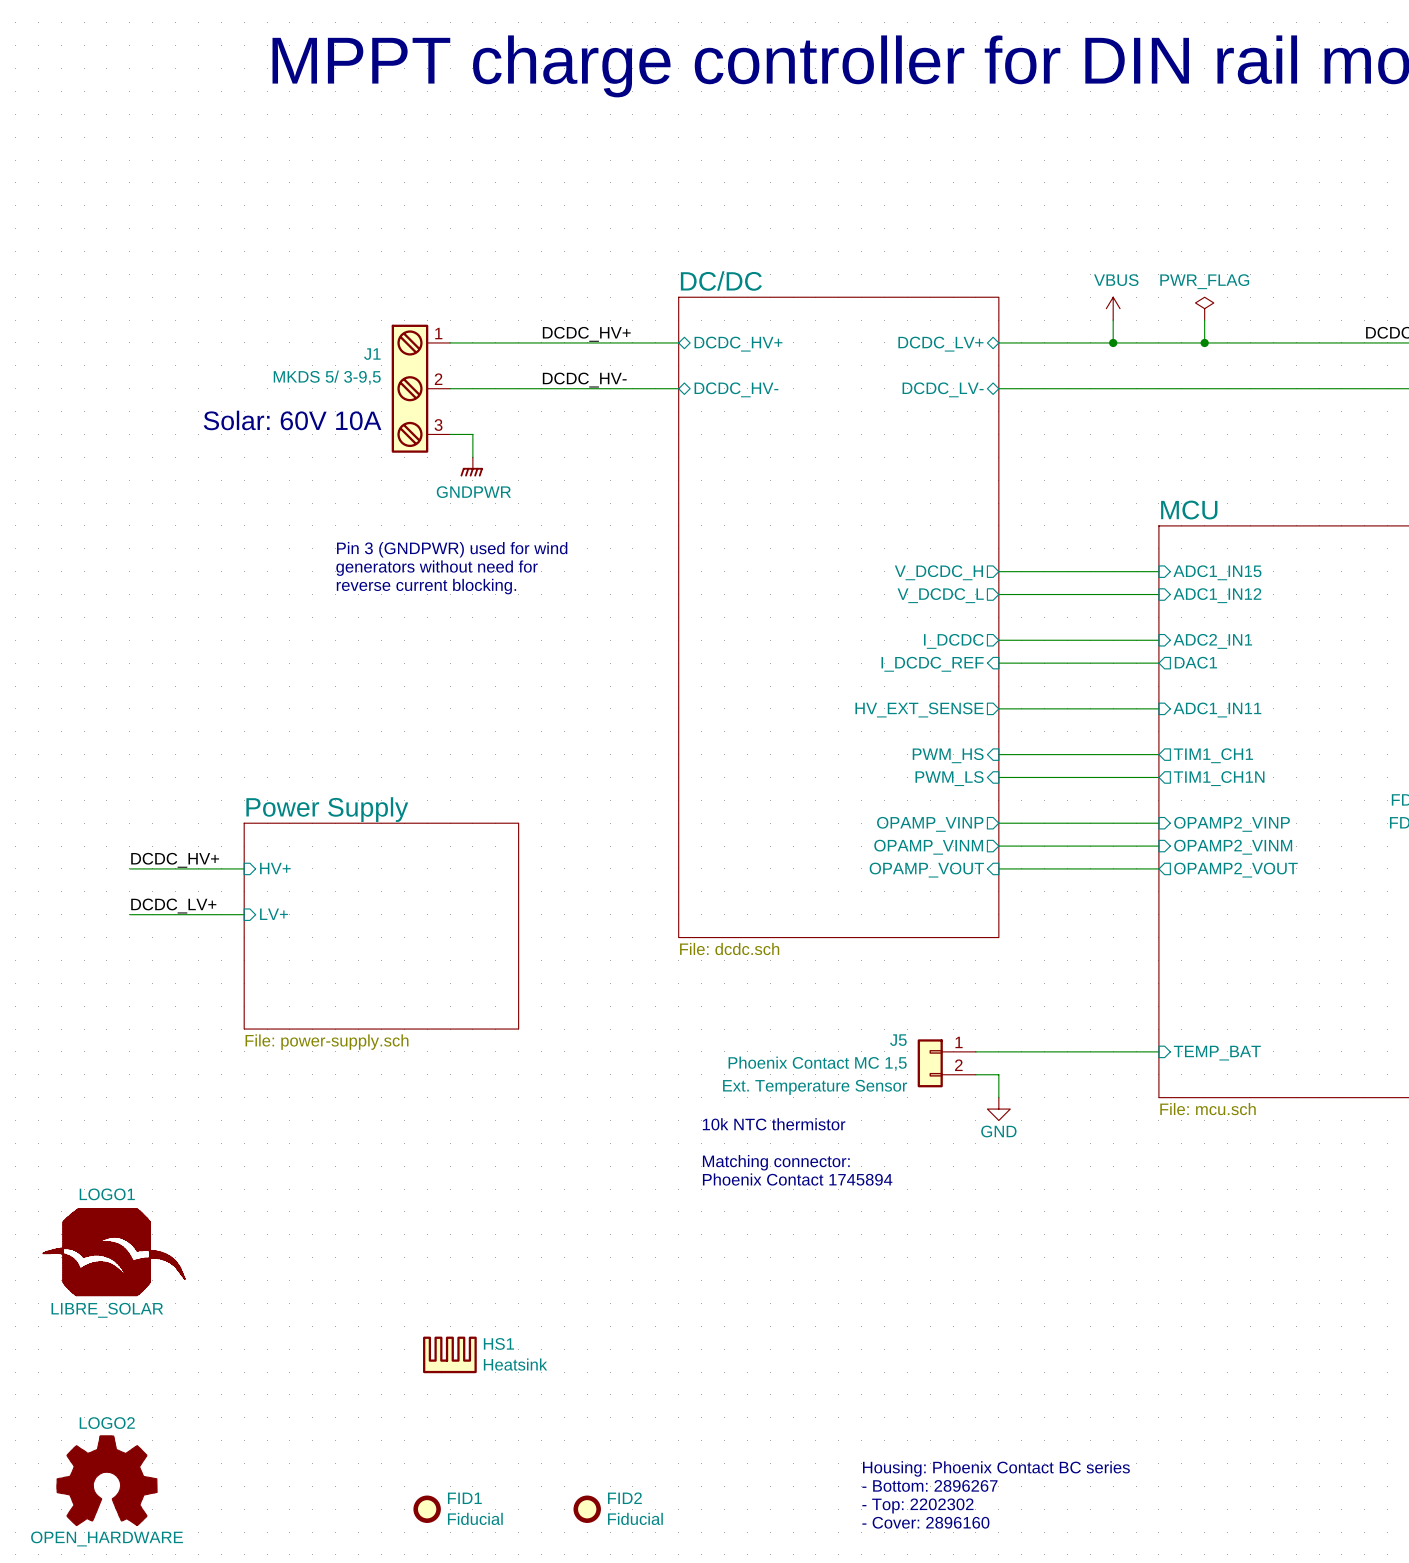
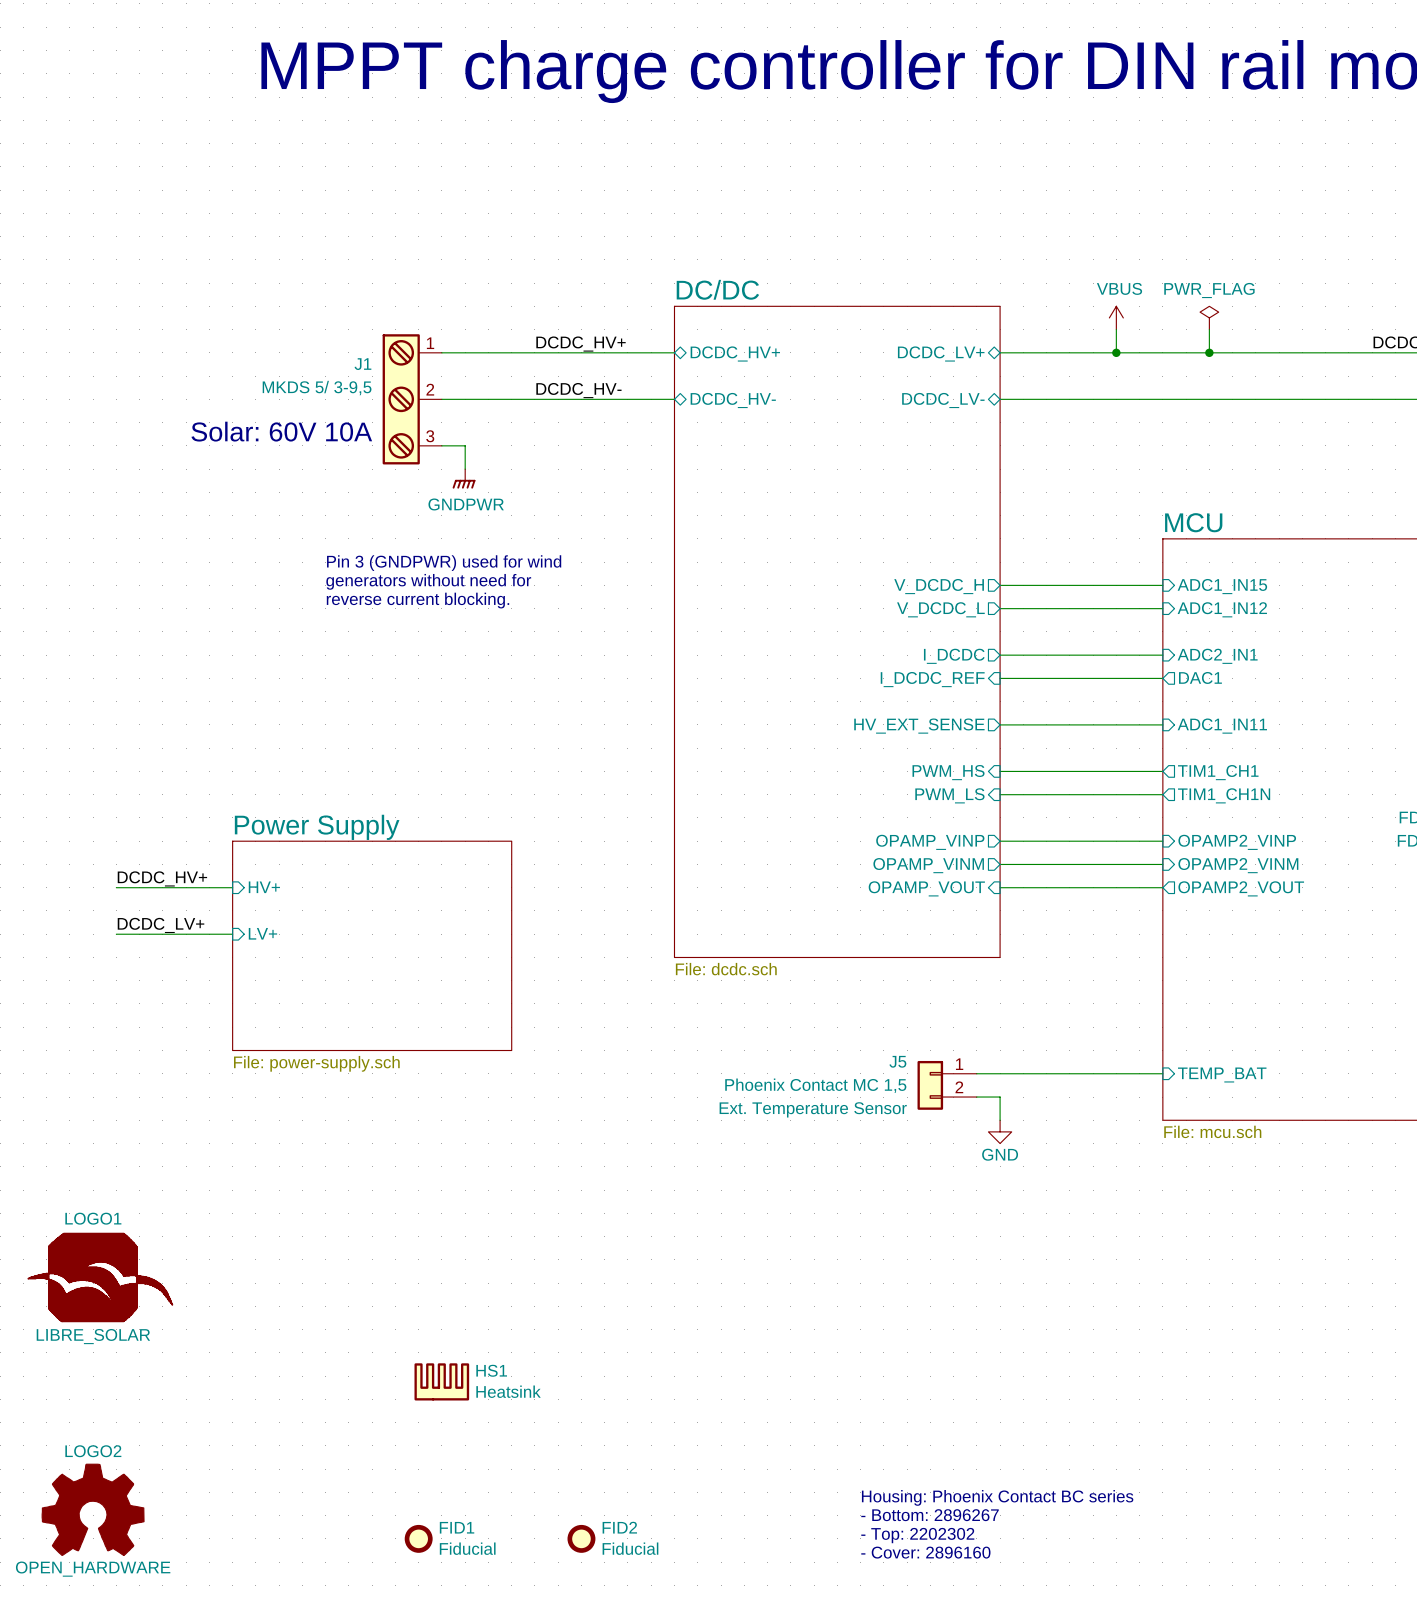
text: 10k NTC thermistor (774, 1124) -> none
text: Matching connector: (776, 1162) -> none
text: Phoenix Contact 1745894 (797, 1179) -> none

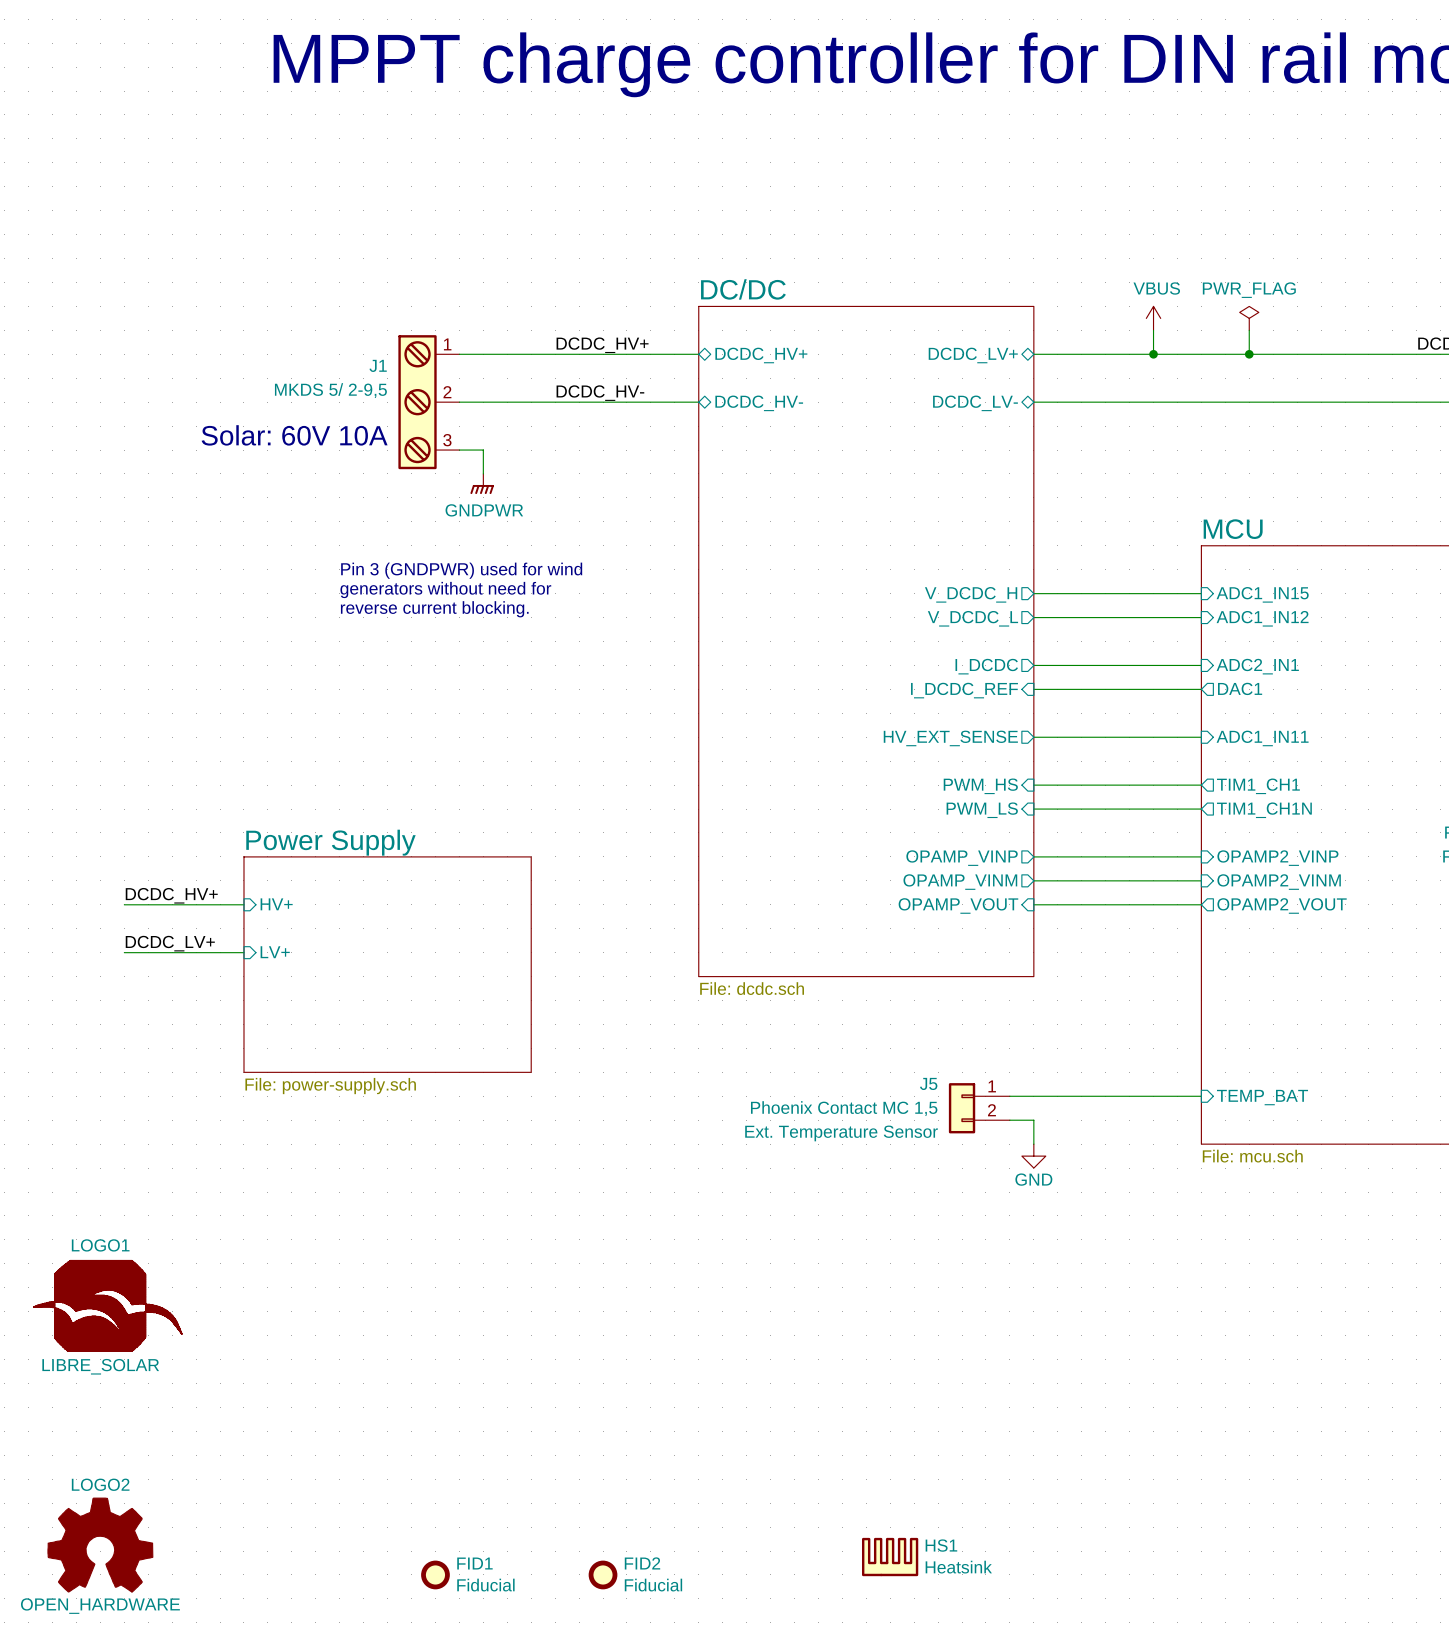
J1 value: MKDS 5/ 3-9,5 (317, 388) -> MKDS 5/ 2-9,5 (330, 390)
HS1 position: (441, 1381) -> (890, 1557)
text: Housing: Phoenix Contact BC series (997, 1497) -> none
text: - Bottom: 2896267 (930, 1515) -> none
text: - Top: 2202302 (917, 1535) -> none
text: - Cover: 2896160 (925, 1552) -> none

